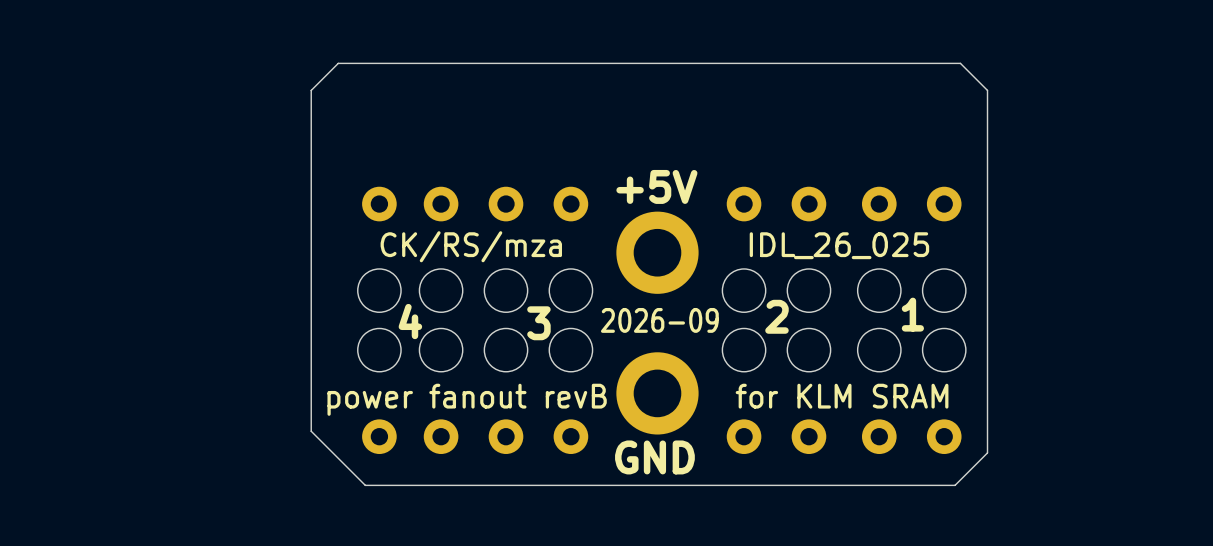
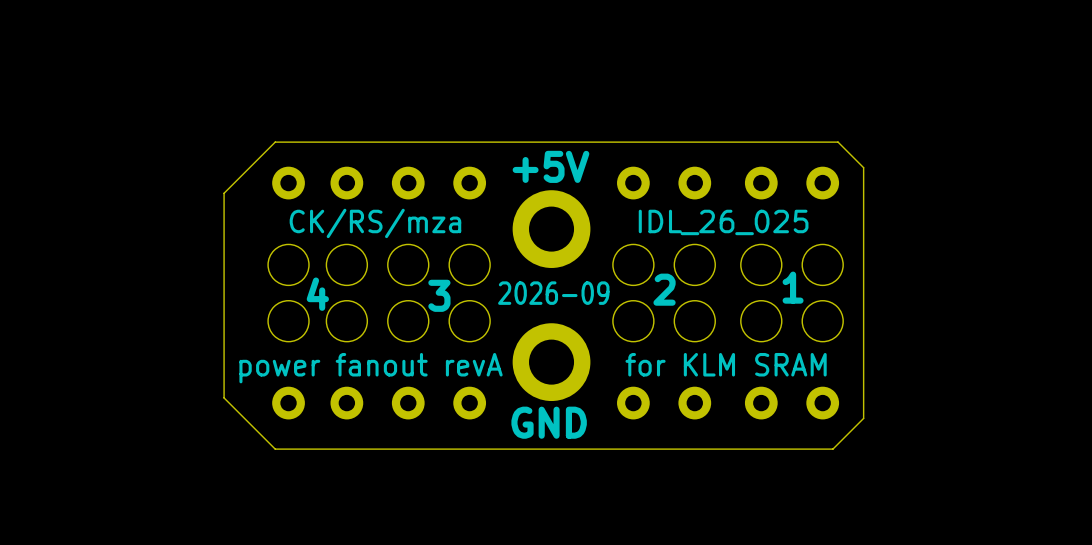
board edge: (987, 187) (987, 90) (960, 63) (338, 63) (311, 90) (311, 214) -> (863, 167) (838, 142) (275, 142) (224, 193)
text: power fanout revB (467, 399) -> power fanout revA (371, 368)

